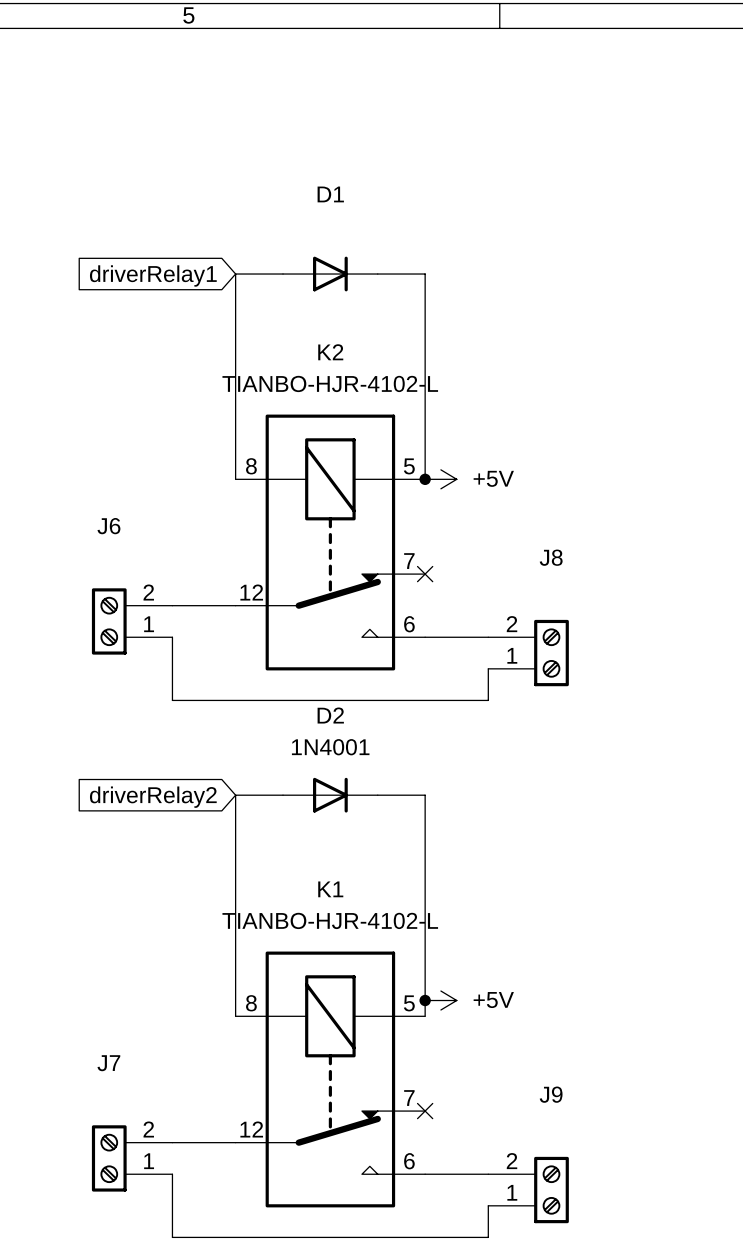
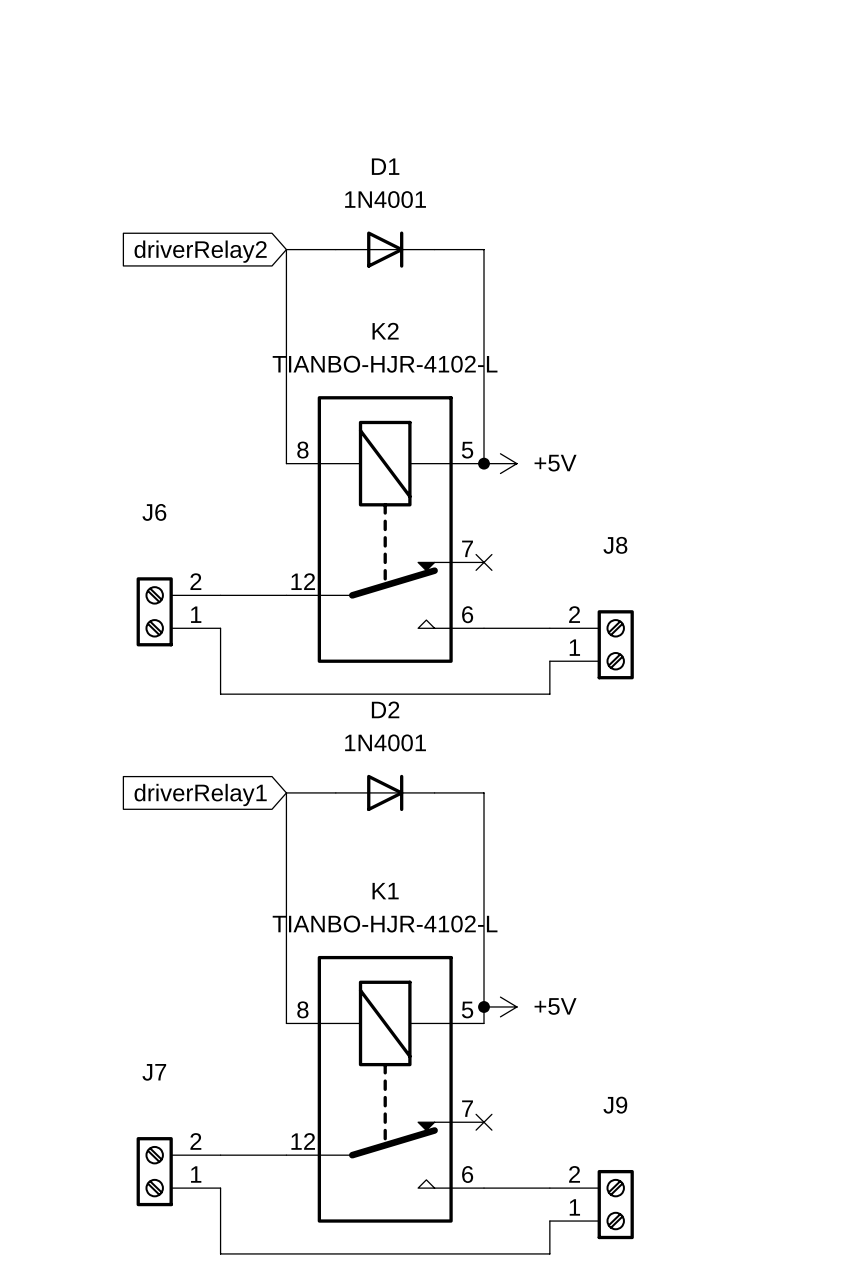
D1 value: none -> 1N4001 (385, 199)
global label: driverRelay1 (153, 275) -> driverRelay2 (200, 251)
global label: driverRelay2 (153, 797) -> driverRelay1 (200, 794)

